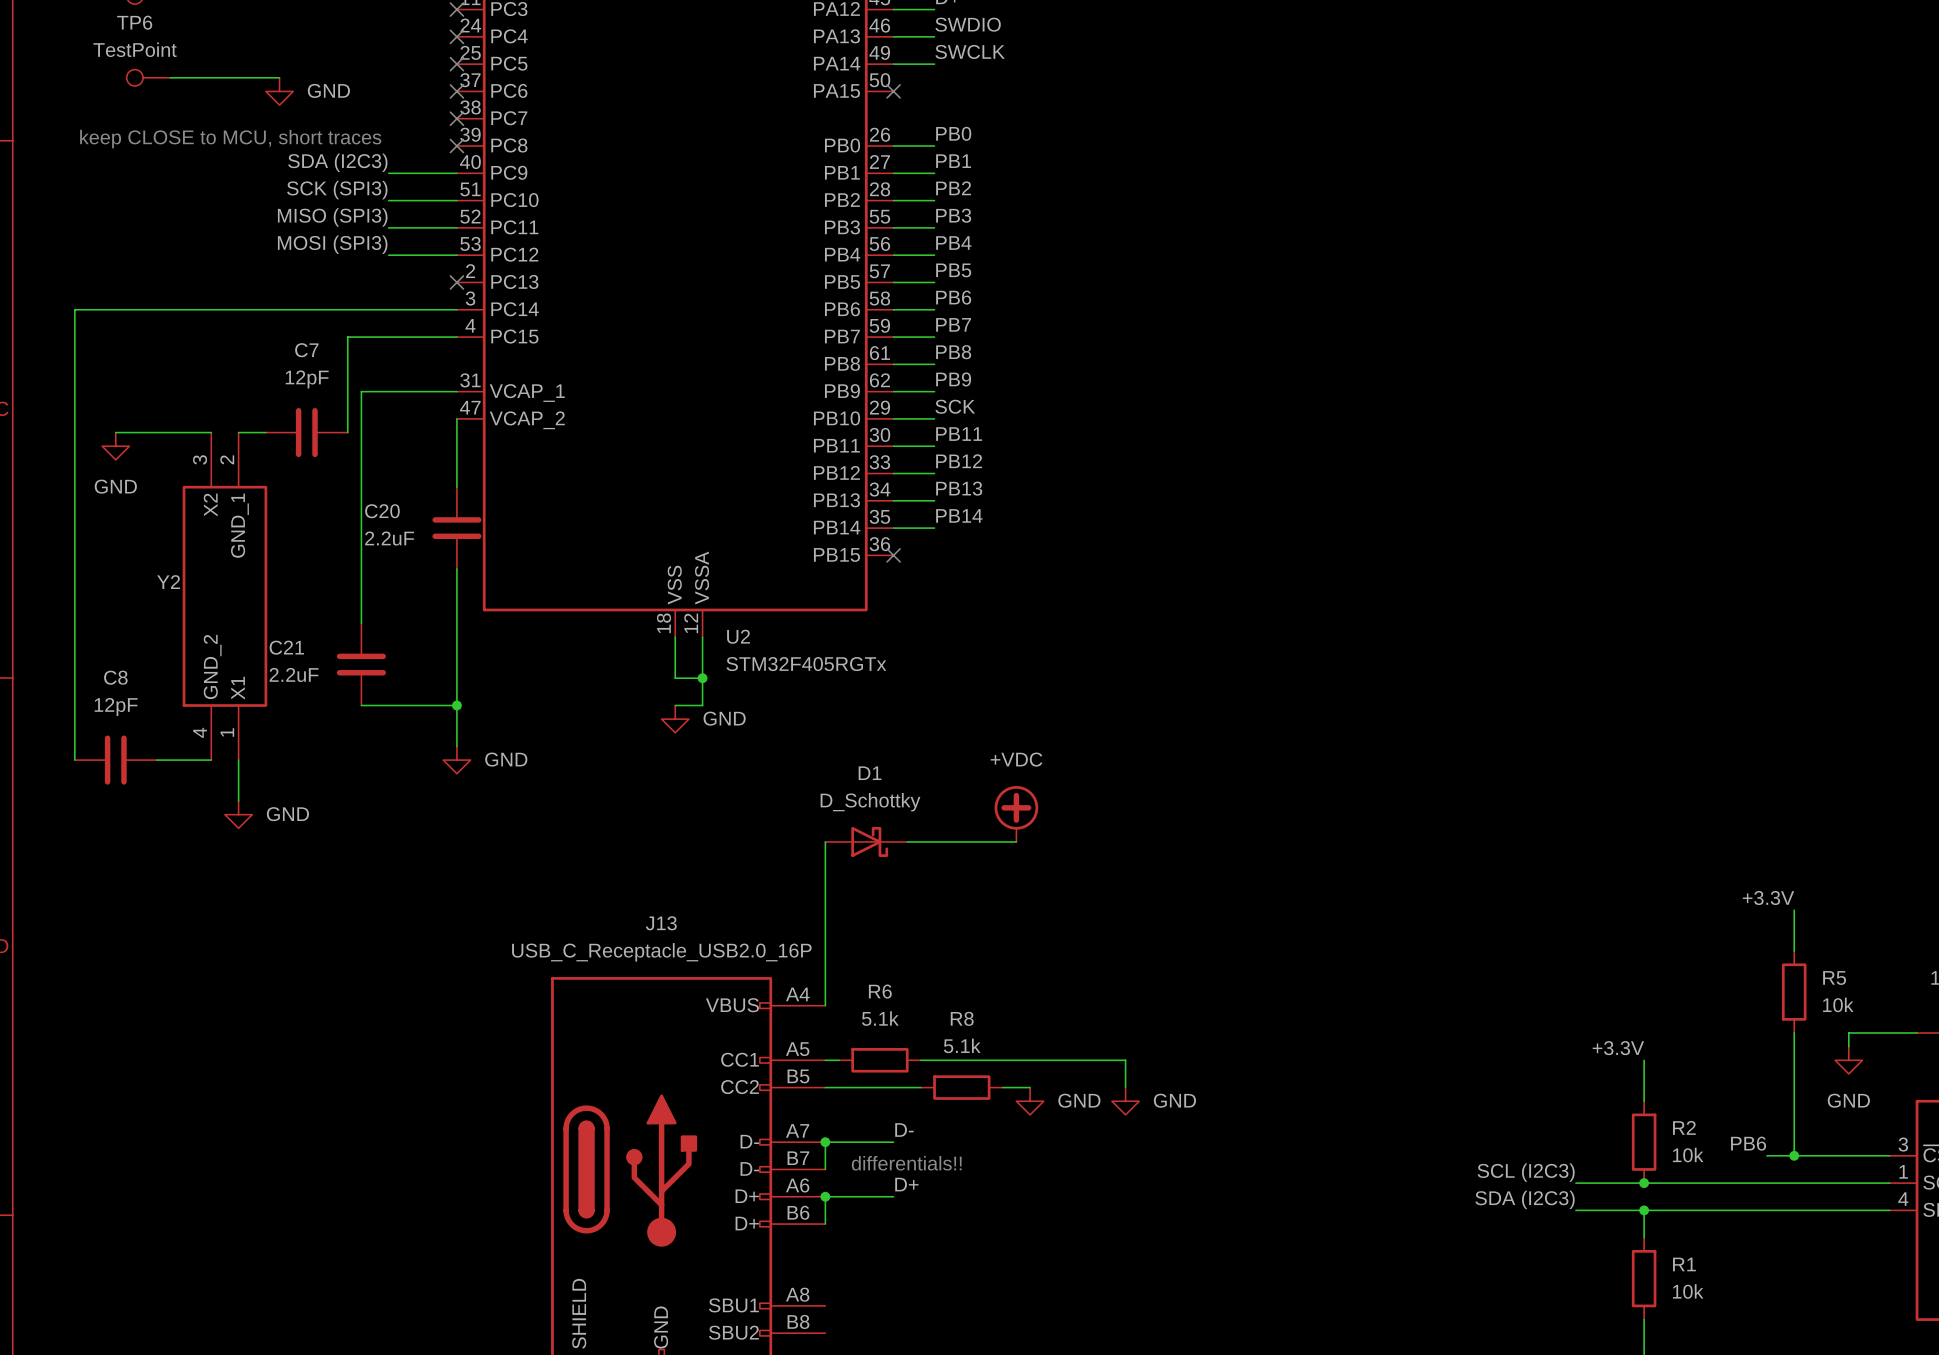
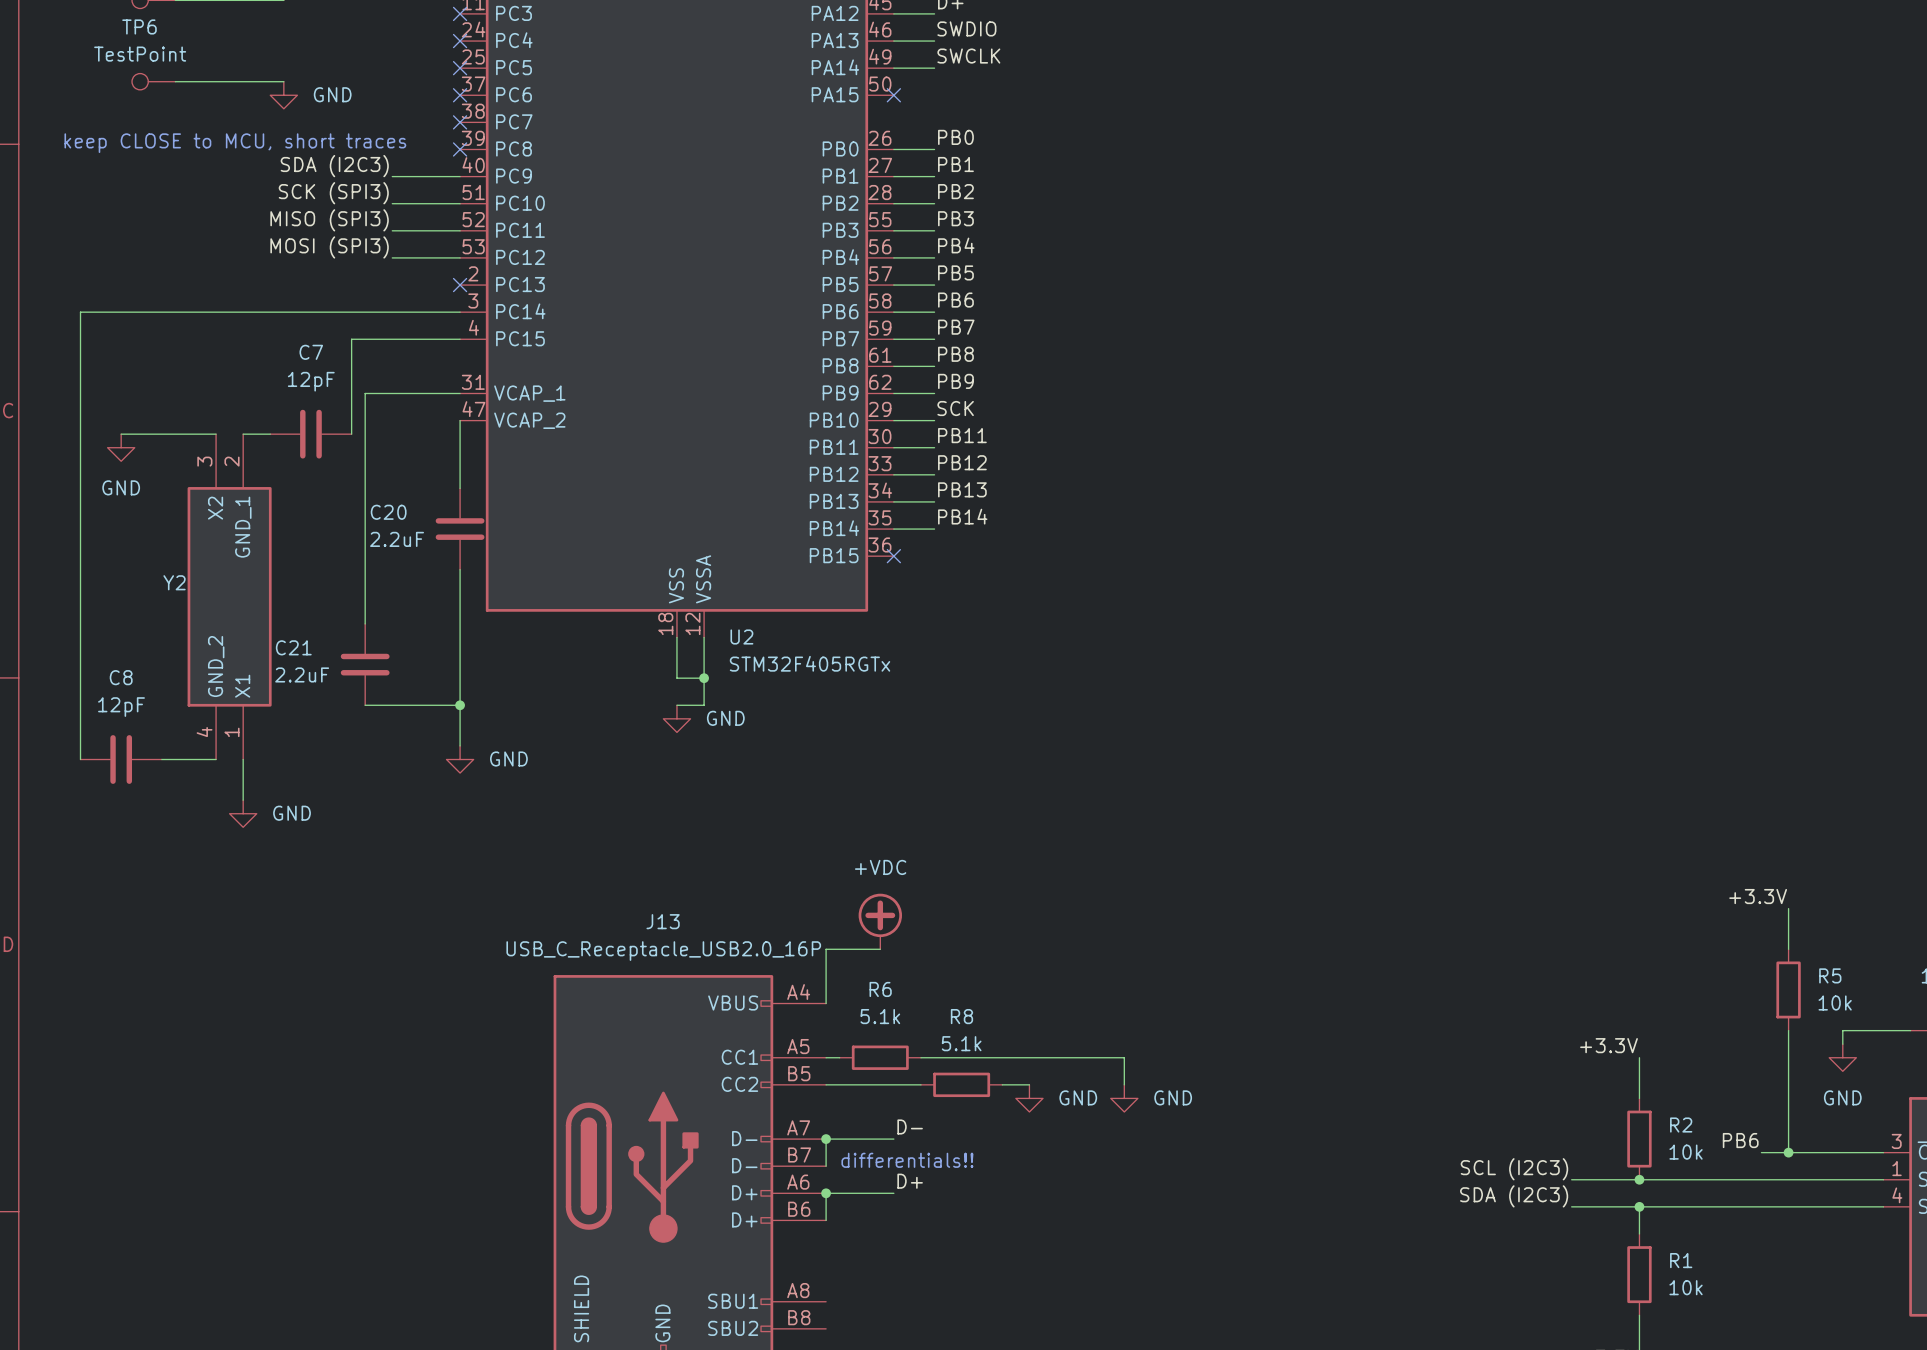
power symbol position: +VDC (1016, 813) -> +VDC (880, 921)
wire: (825, 841) (825, 951) -> (880, 949) (826, 949)
D1: D_Schottky (866, 841) -> none
wire: (907, 841) (1016, 841) -> none

